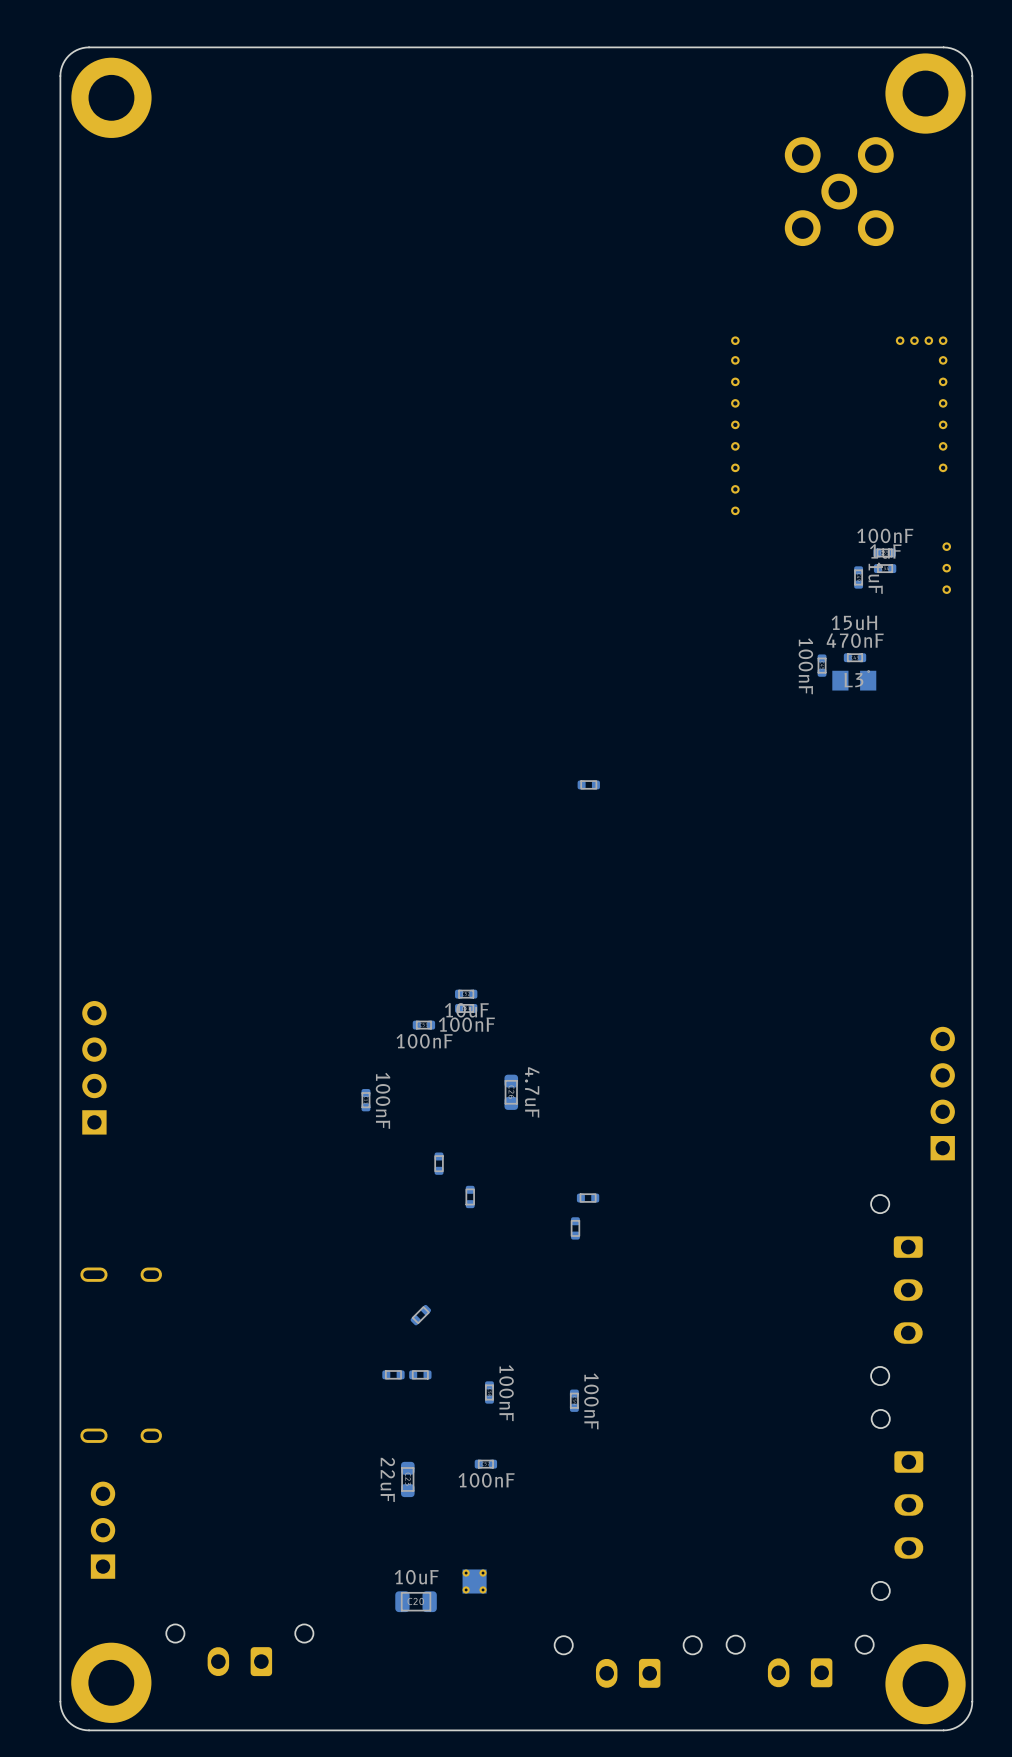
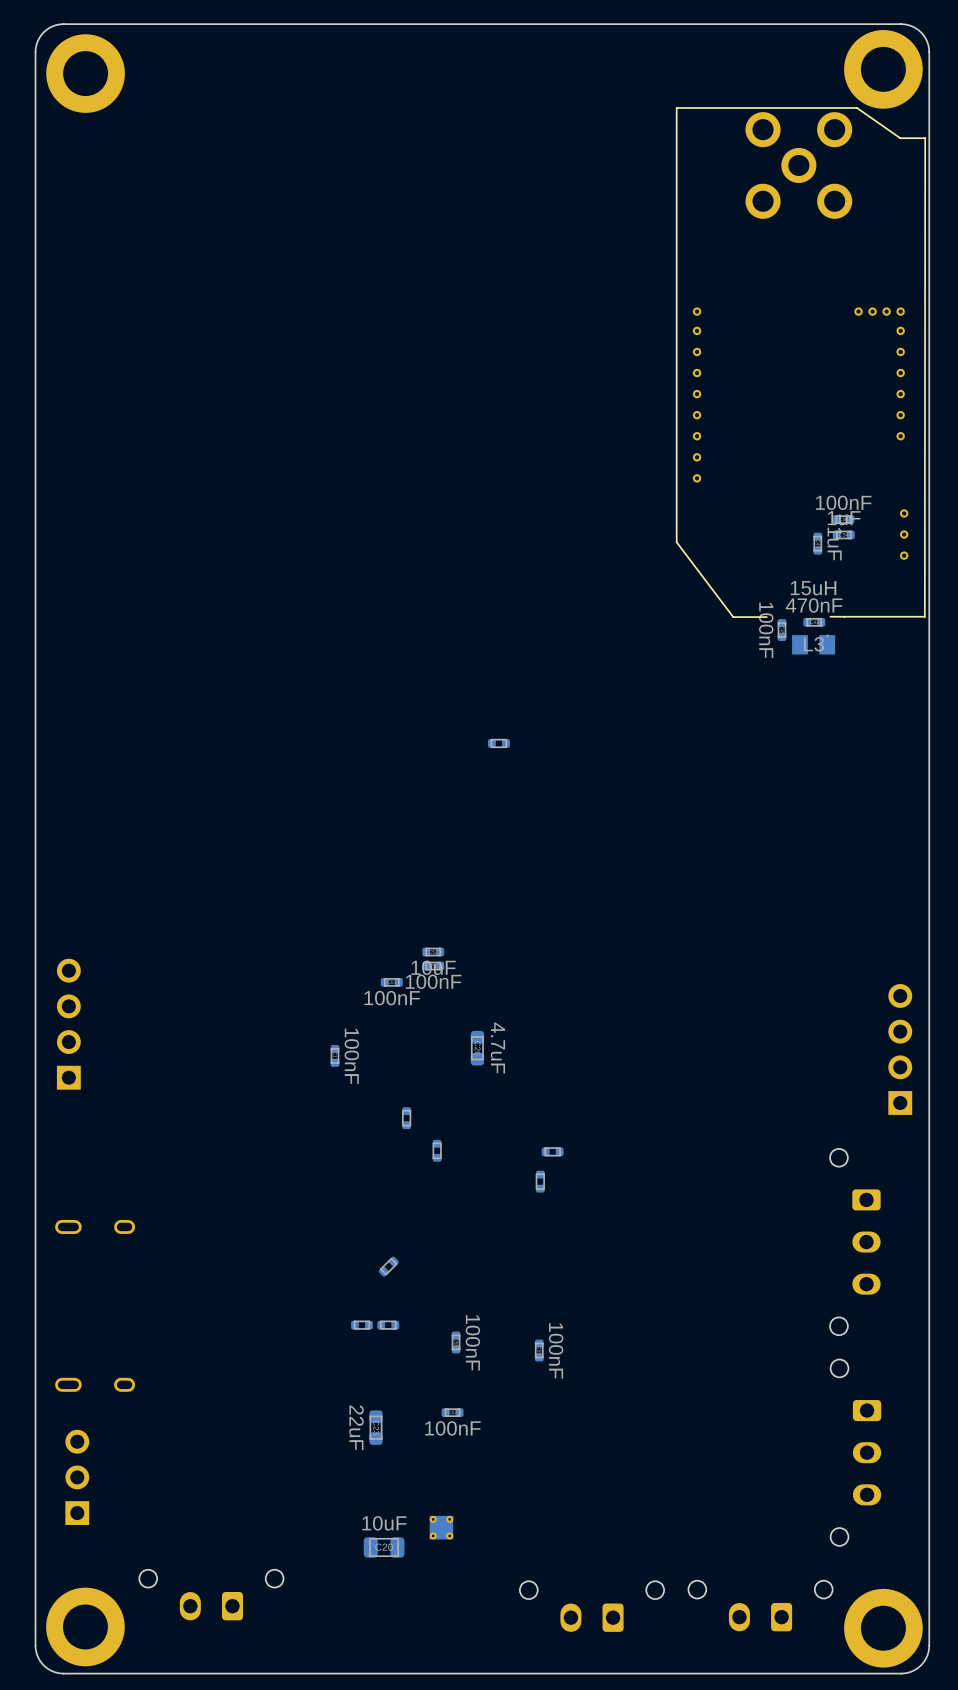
line: none -> (830, 616) (924, 616) (925, 138) (900, 138) (857, 107) (676, 107) (676, 542) (733, 617) (766, 617)
part position: (588, 784) -> (498, 743)

